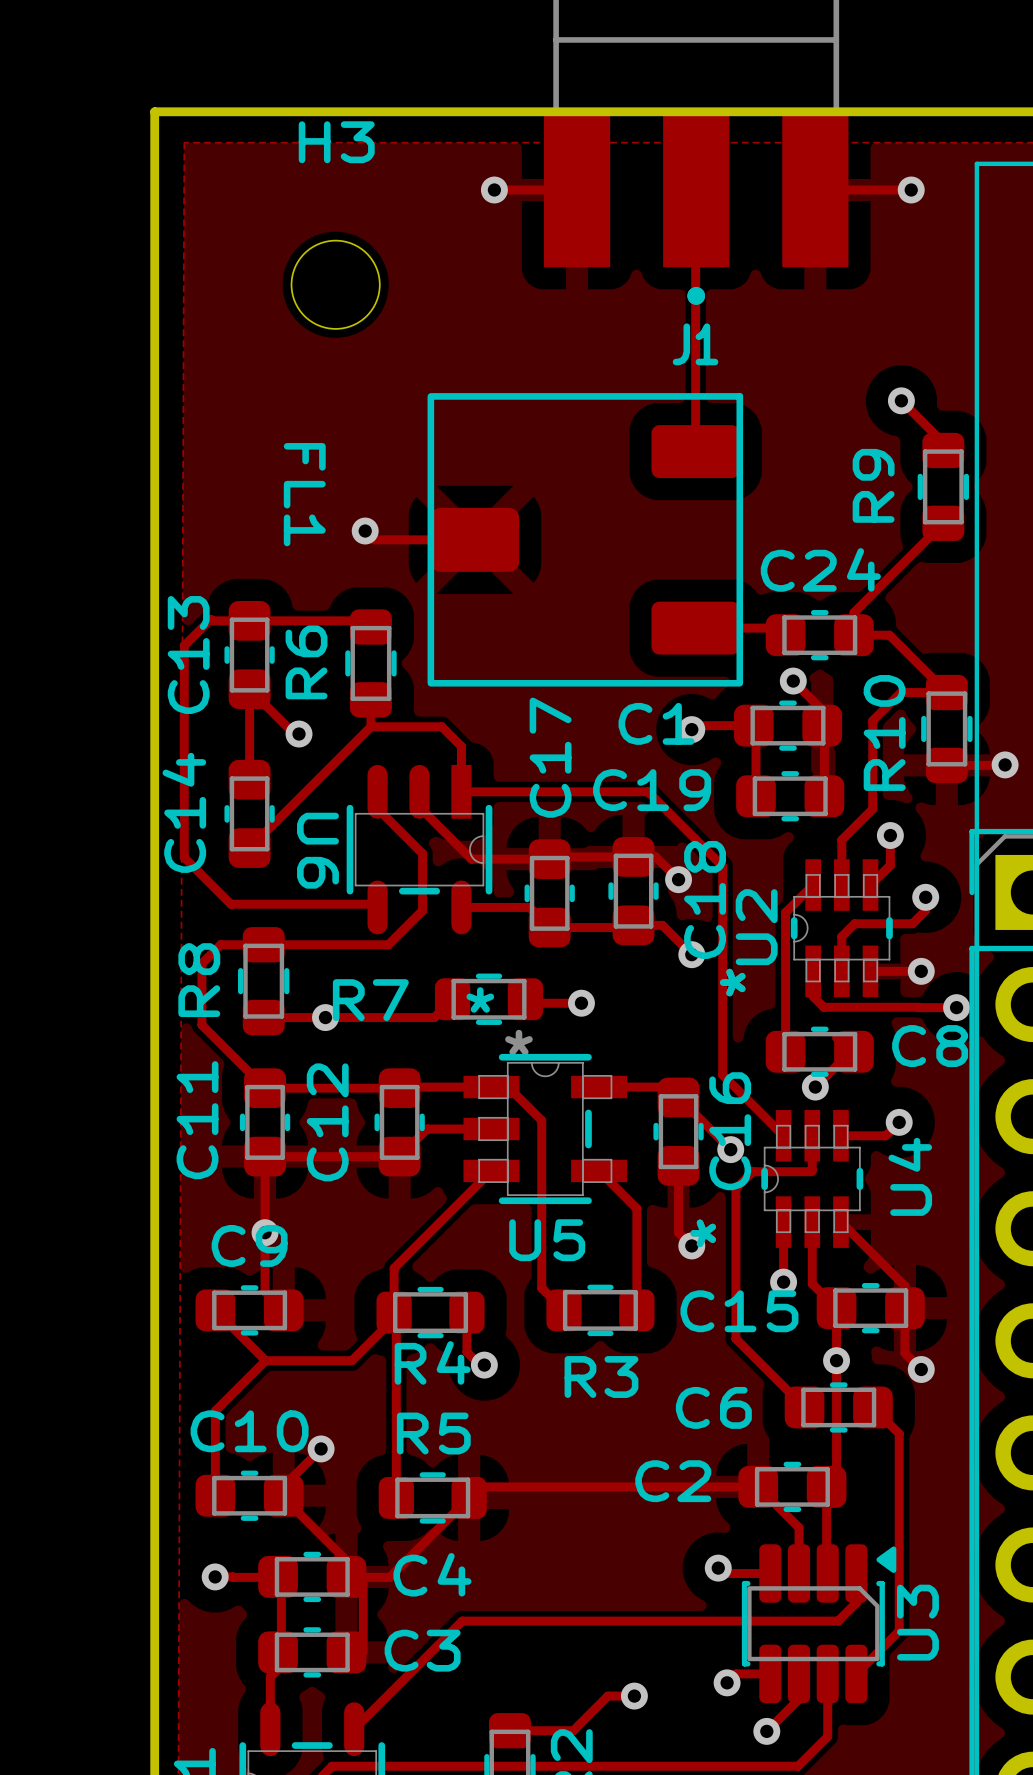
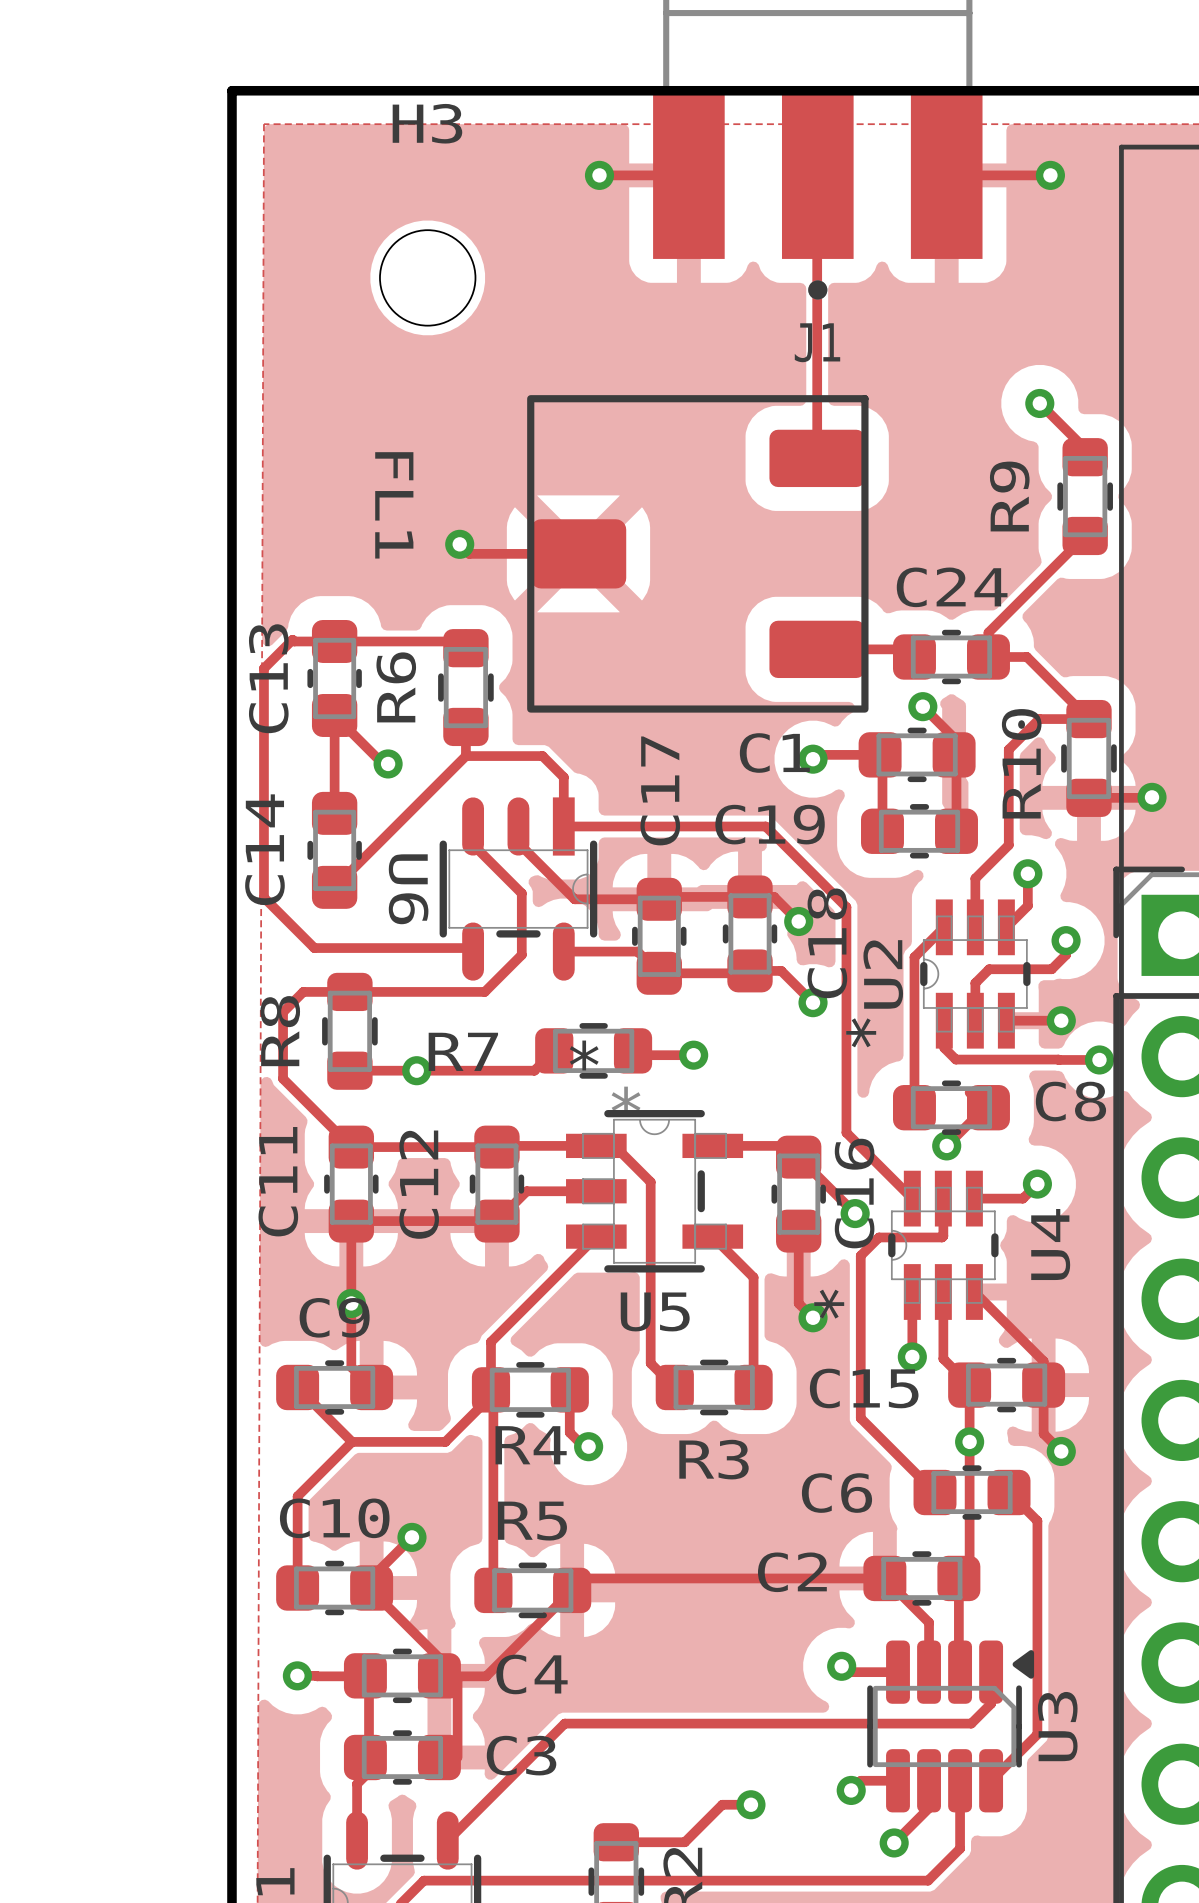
U3 footprint: [741, 1544, 897, 1704] -> [867, 1640, 1035, 1813]

